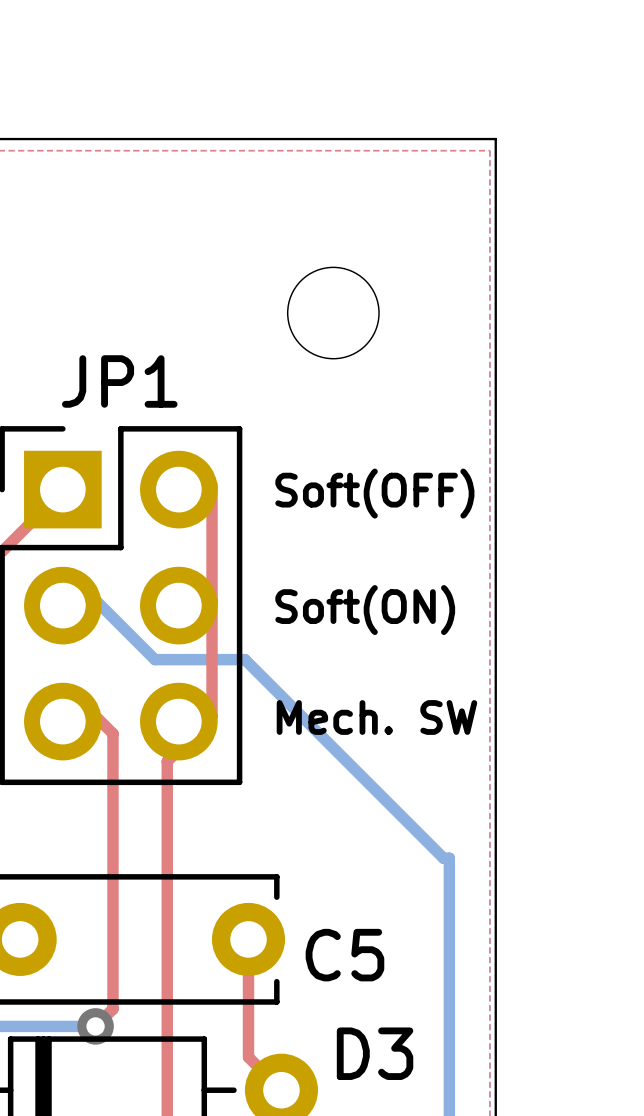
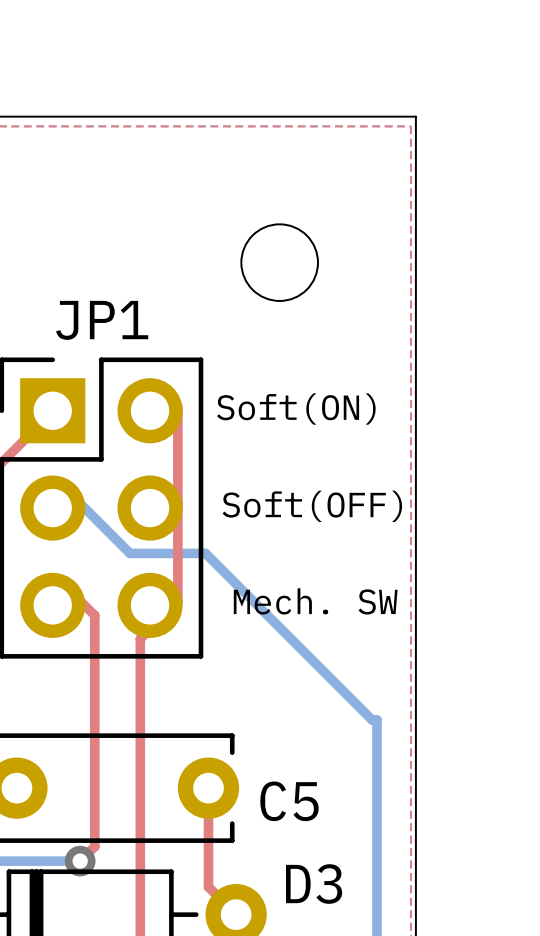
text position: Soft(OFF) (374, 493) -> Soft(OFF) (312, 506)
text position: Soft(ON) (365, 610) -> Soft(ON) (296, 409)

